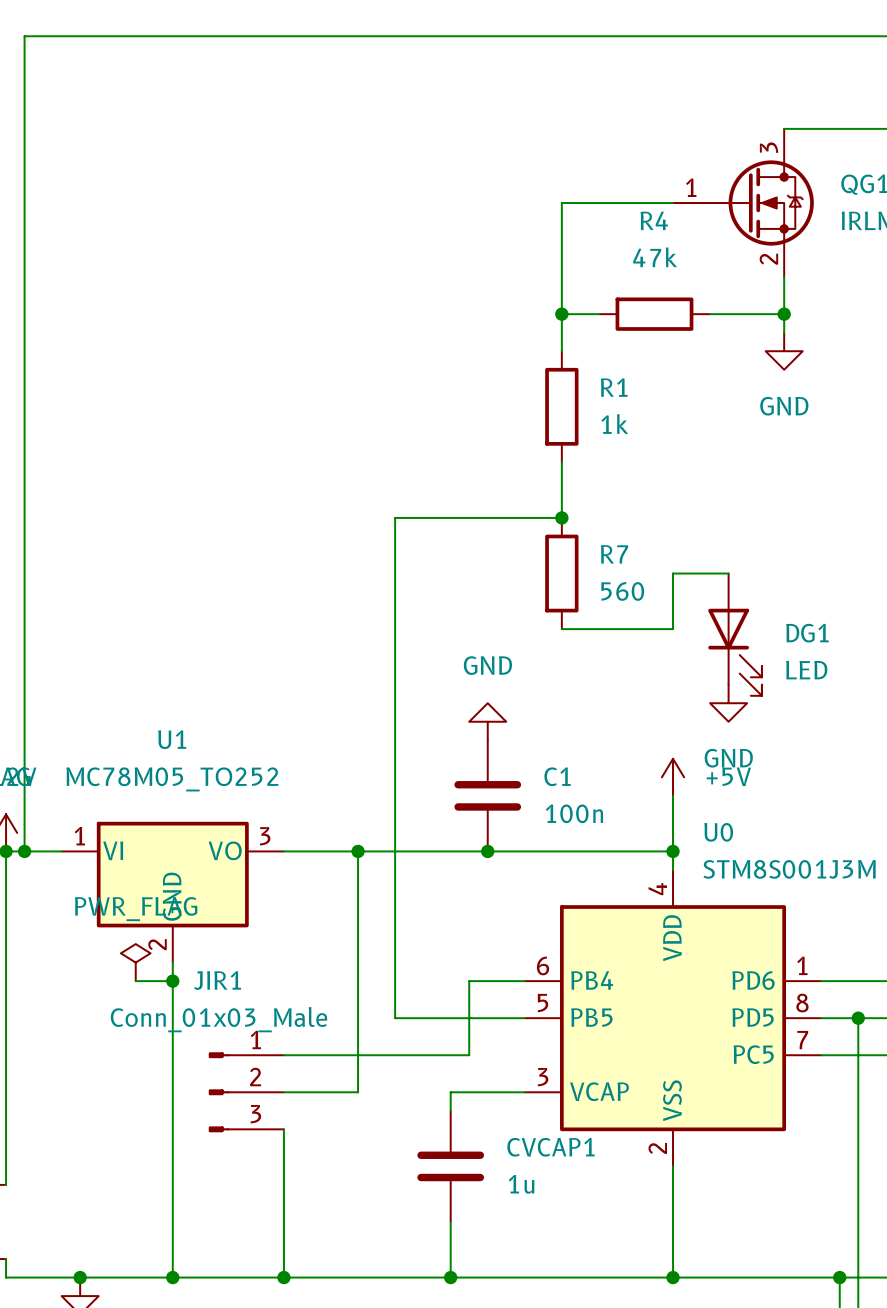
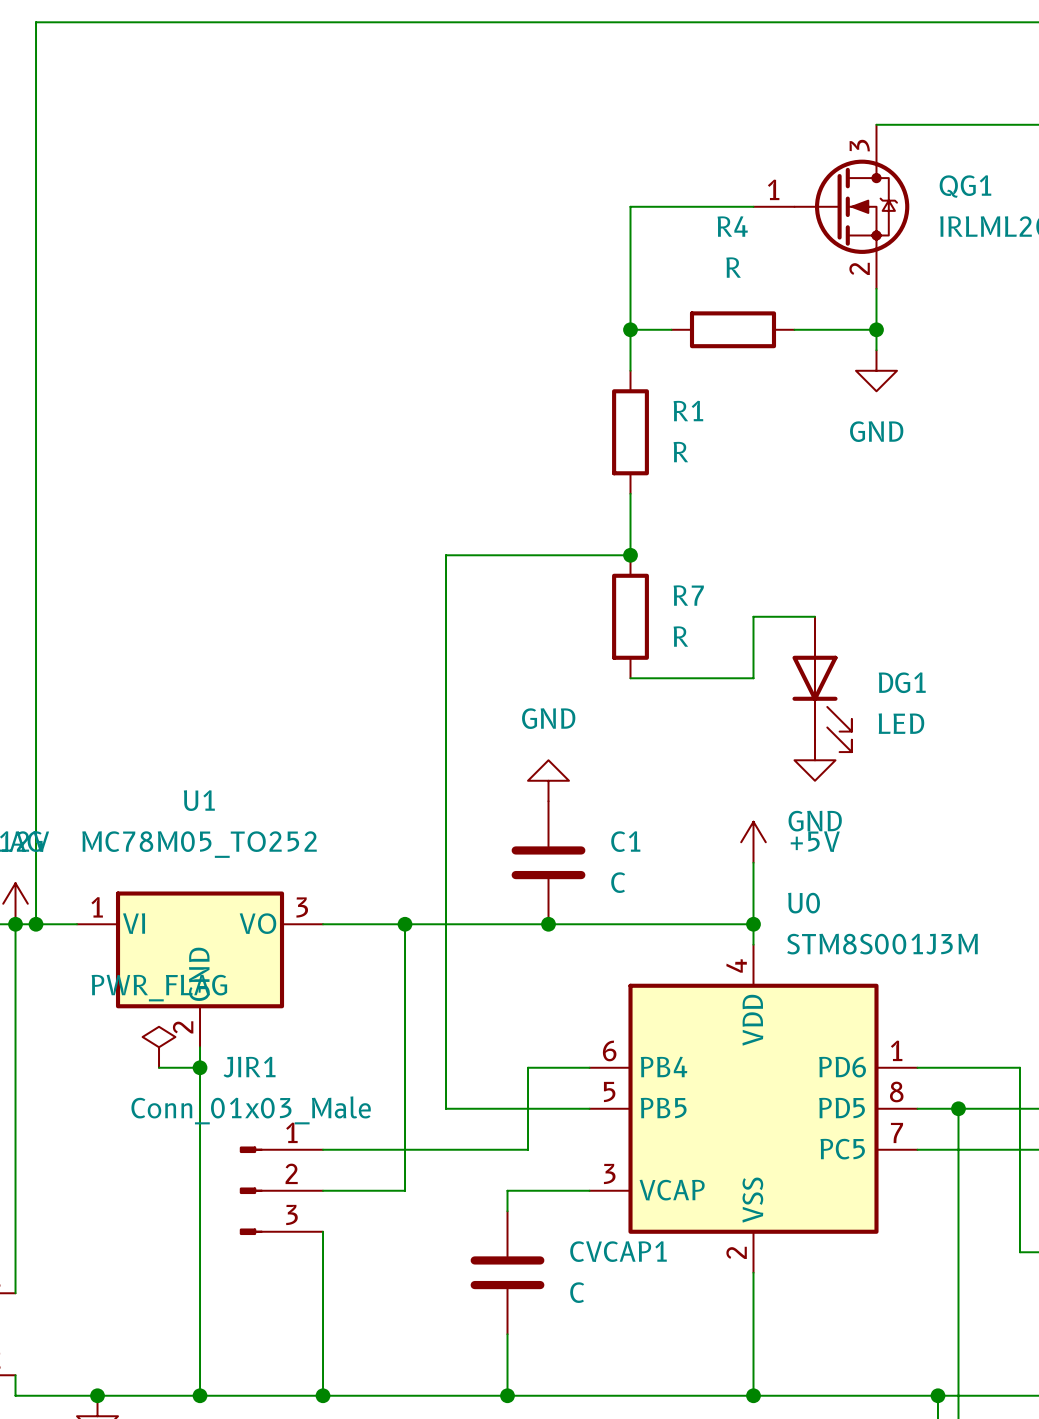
R4 value: 47k (655, 257) -> R (733, 267)
R1 value: 1k (614, 424) -> R (680, 452)
R7 value: 560 (622, 591) -> R (680, 636)
C1 value: 100n (574, 813) -> C (618, 882)
CVCAP1 value: 1u (521, 1184) -> C (577, 1292)

